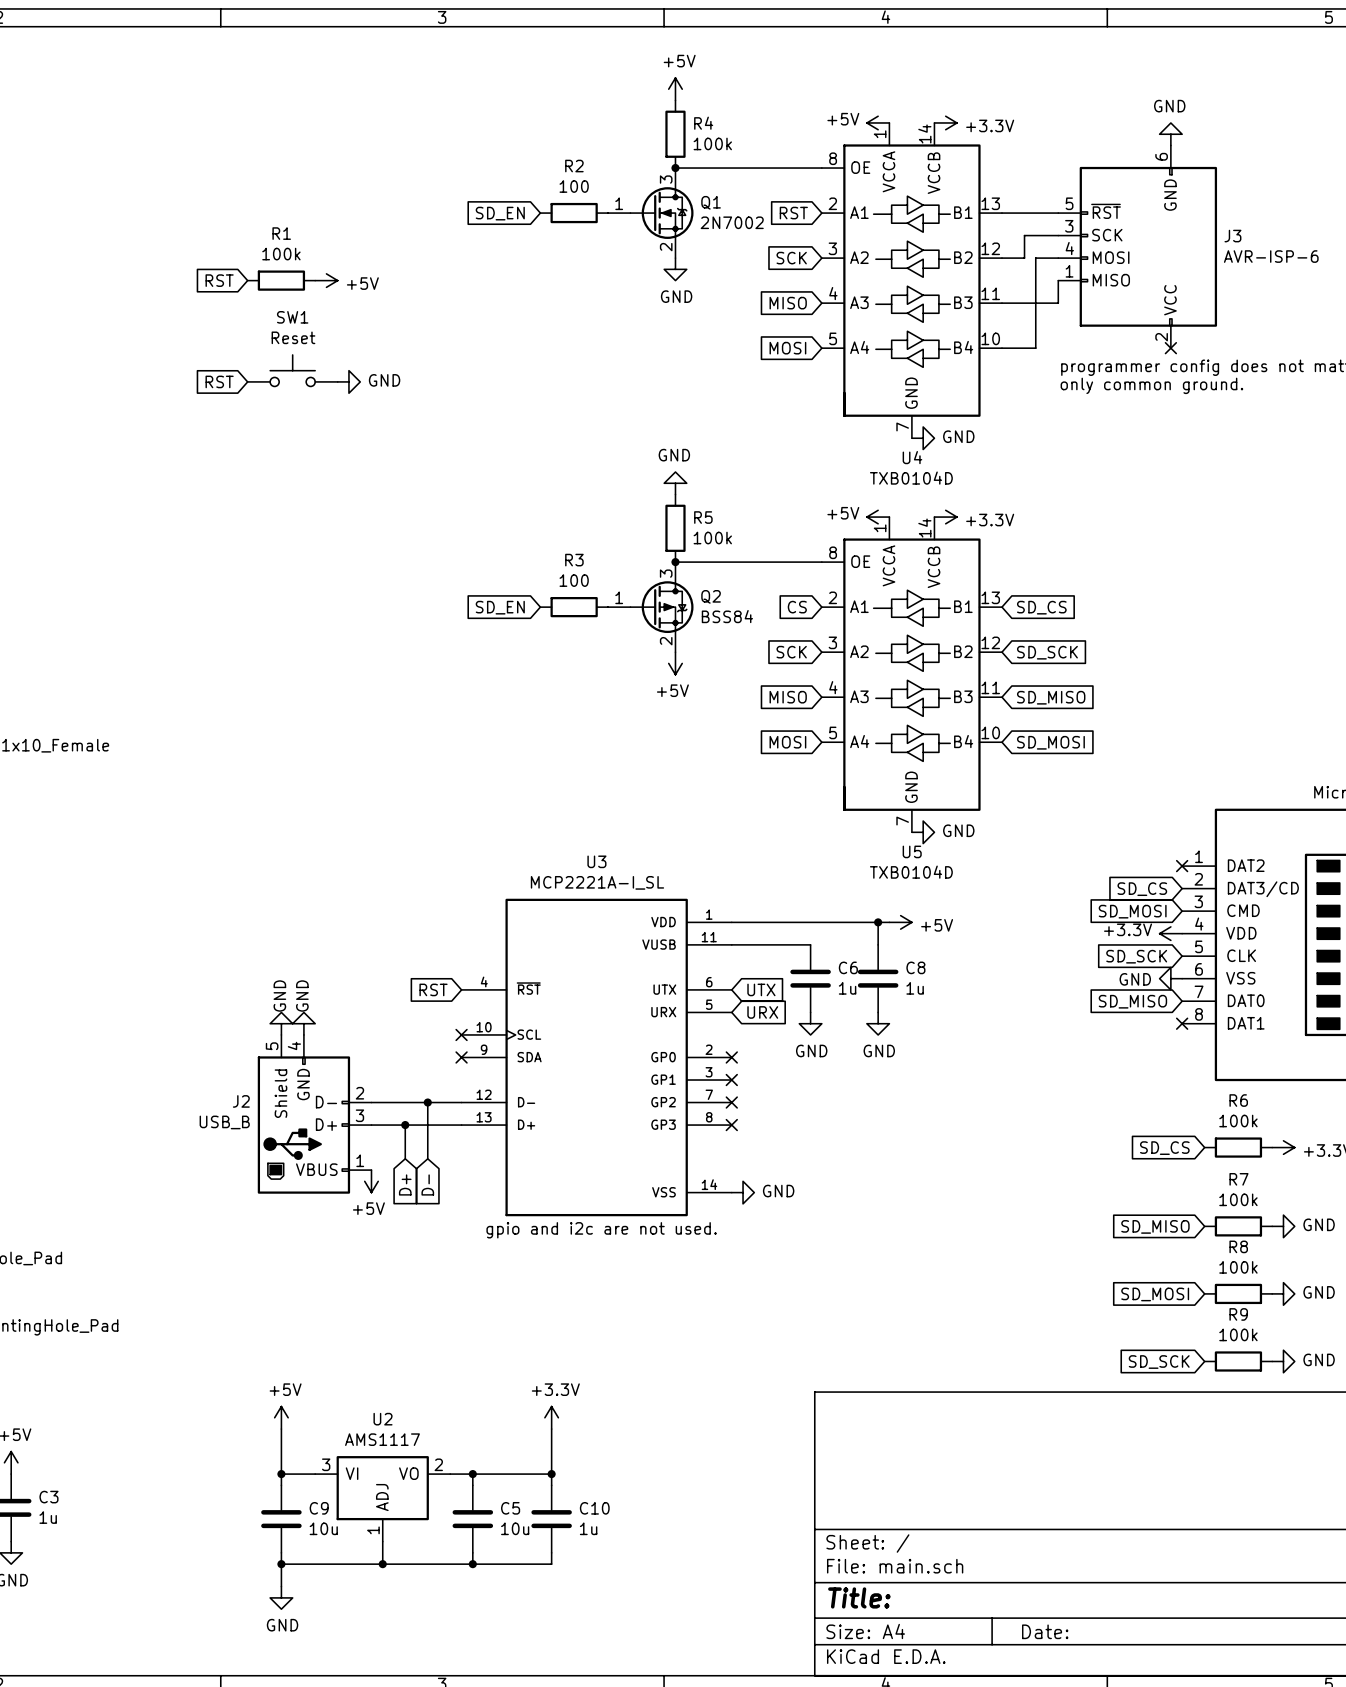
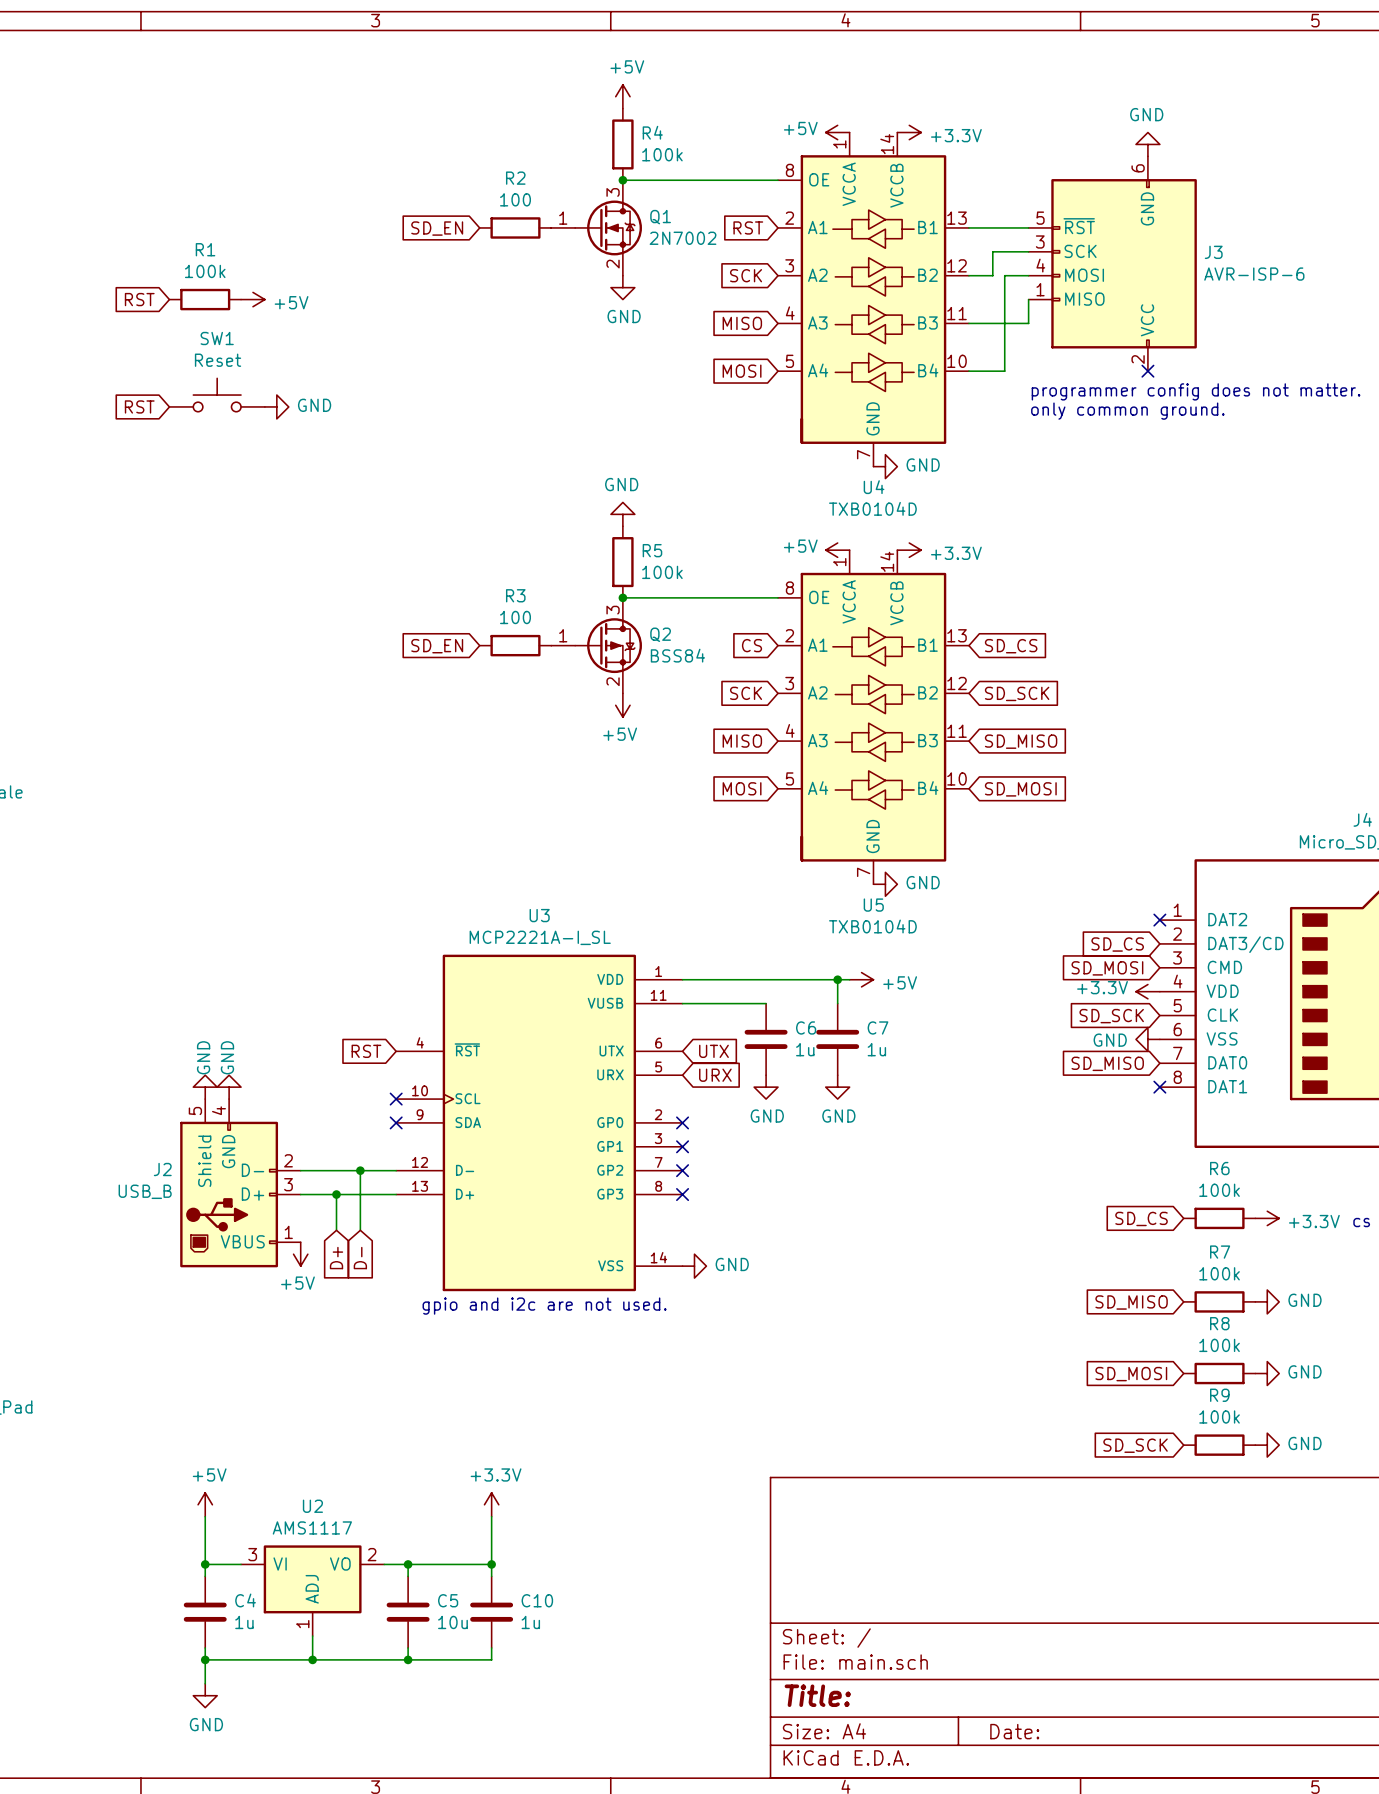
C8 name: C8 (915, 967) -> C7 (878, 1027)
C9 name: C9 (319, 1508) -> C4 (245, 1600)
C9 value: 10u (323, 1528) -> 1u (244, 1622)

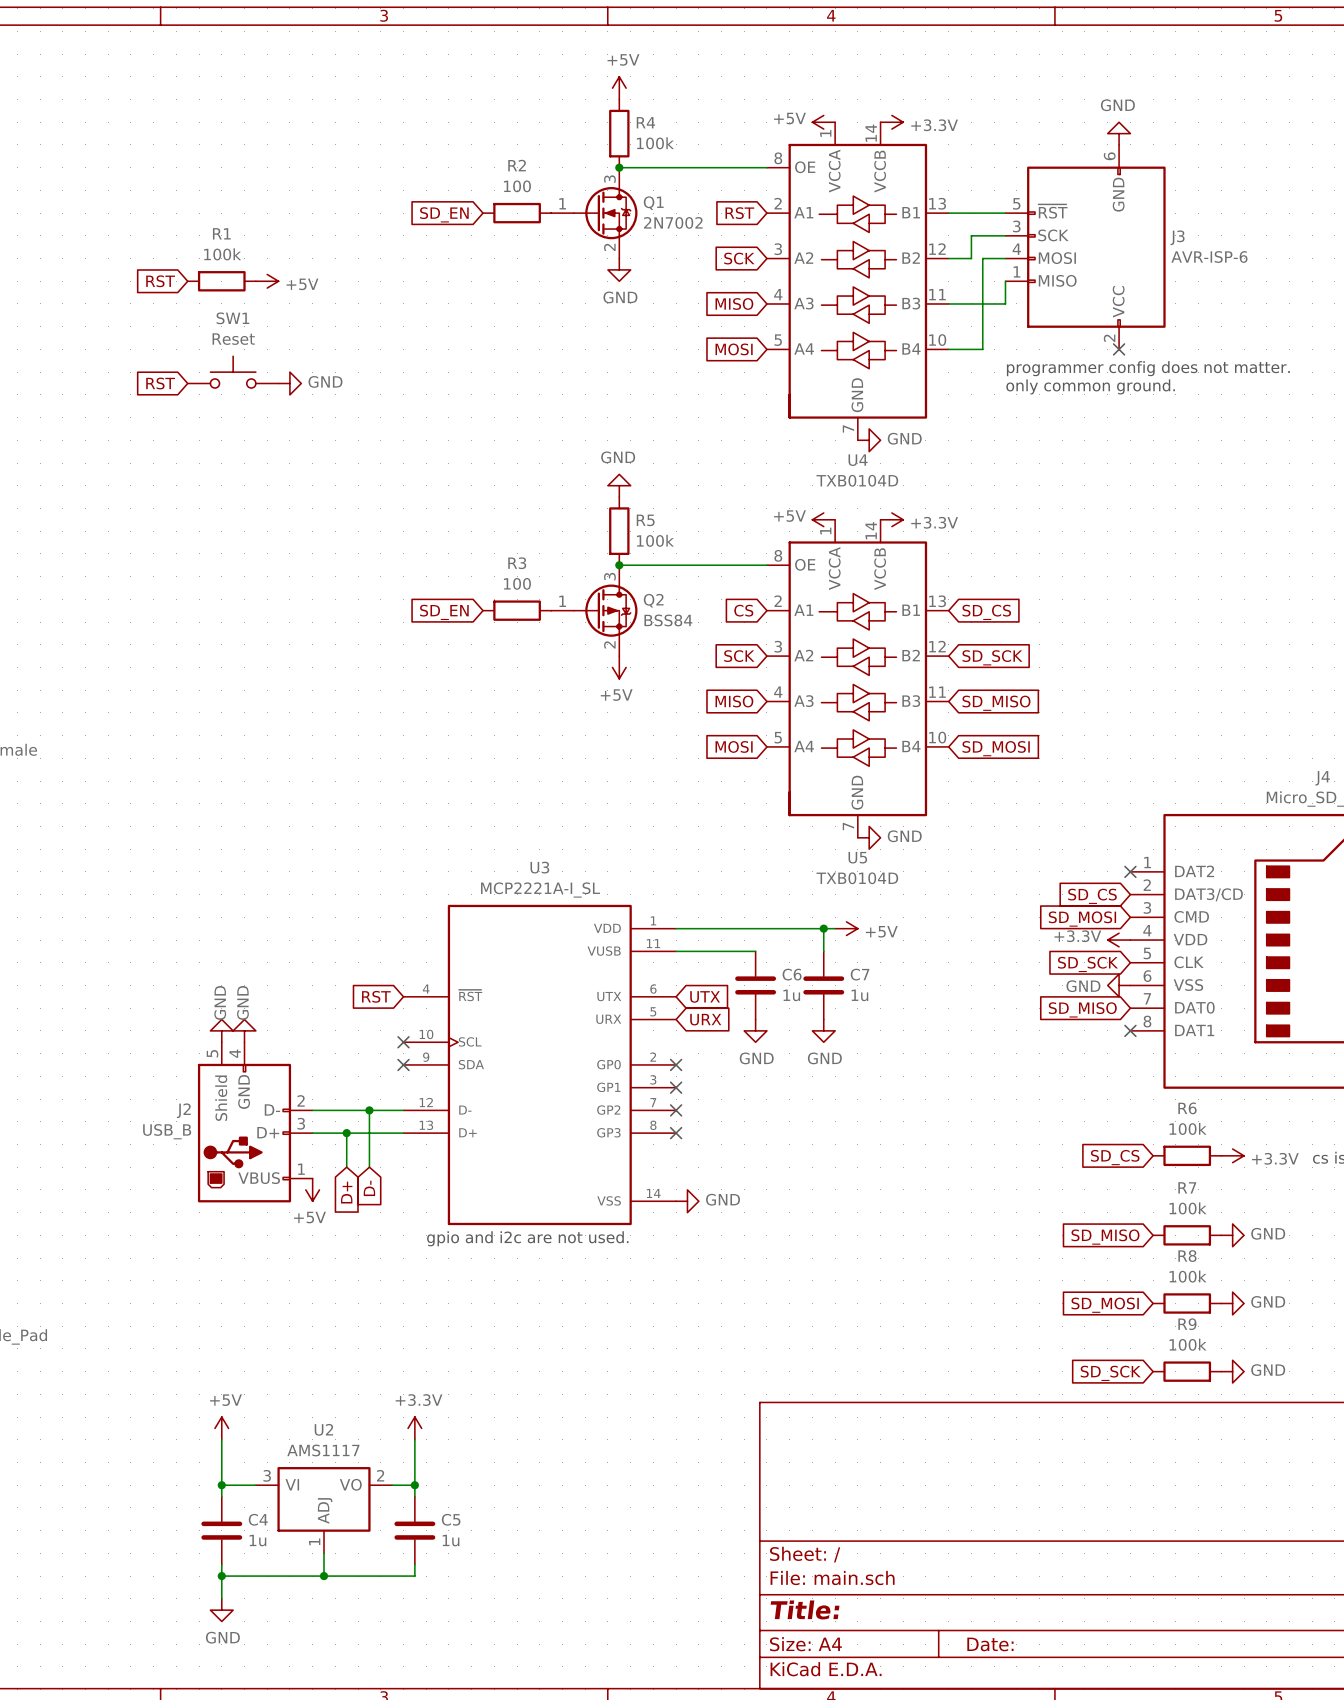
power symbol position: +3.3V (491, 1504) -> +3.3V (414, 1428)
wire: (491, 1516) (491, 1576) -> none
wire: (408, 1564) (491, 1564) -> (414, 1485) (414, 1439)
junction: (491, 1564) -> none
C10: 1u (491, 1612) -> none
C5 value: 10u (452, 1622) -> 1u (451, 1540)
wire: (491, 1647) (491, 1659) (408, 1659) -> none
junction: (408, 1659) -> none

